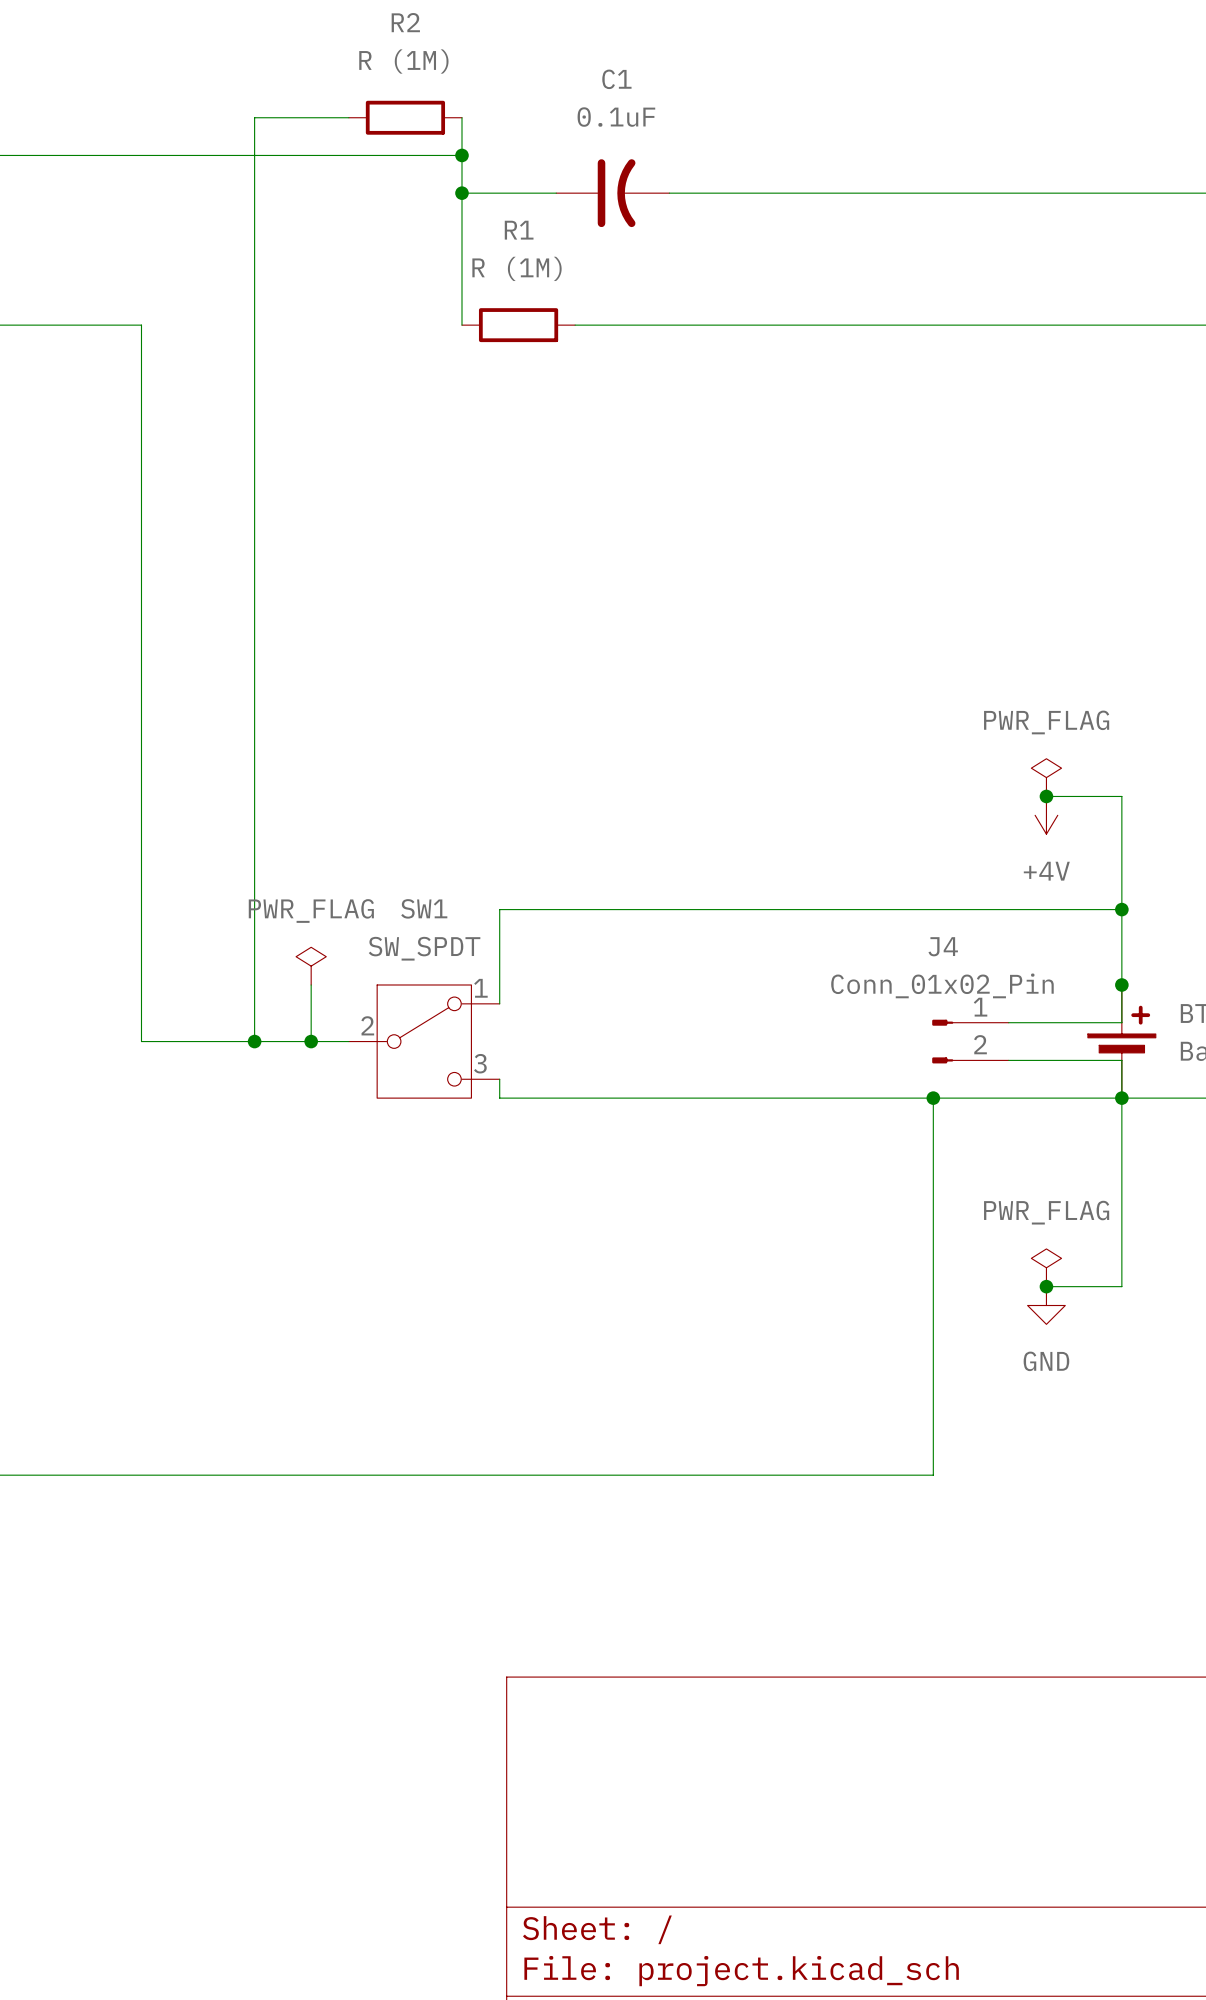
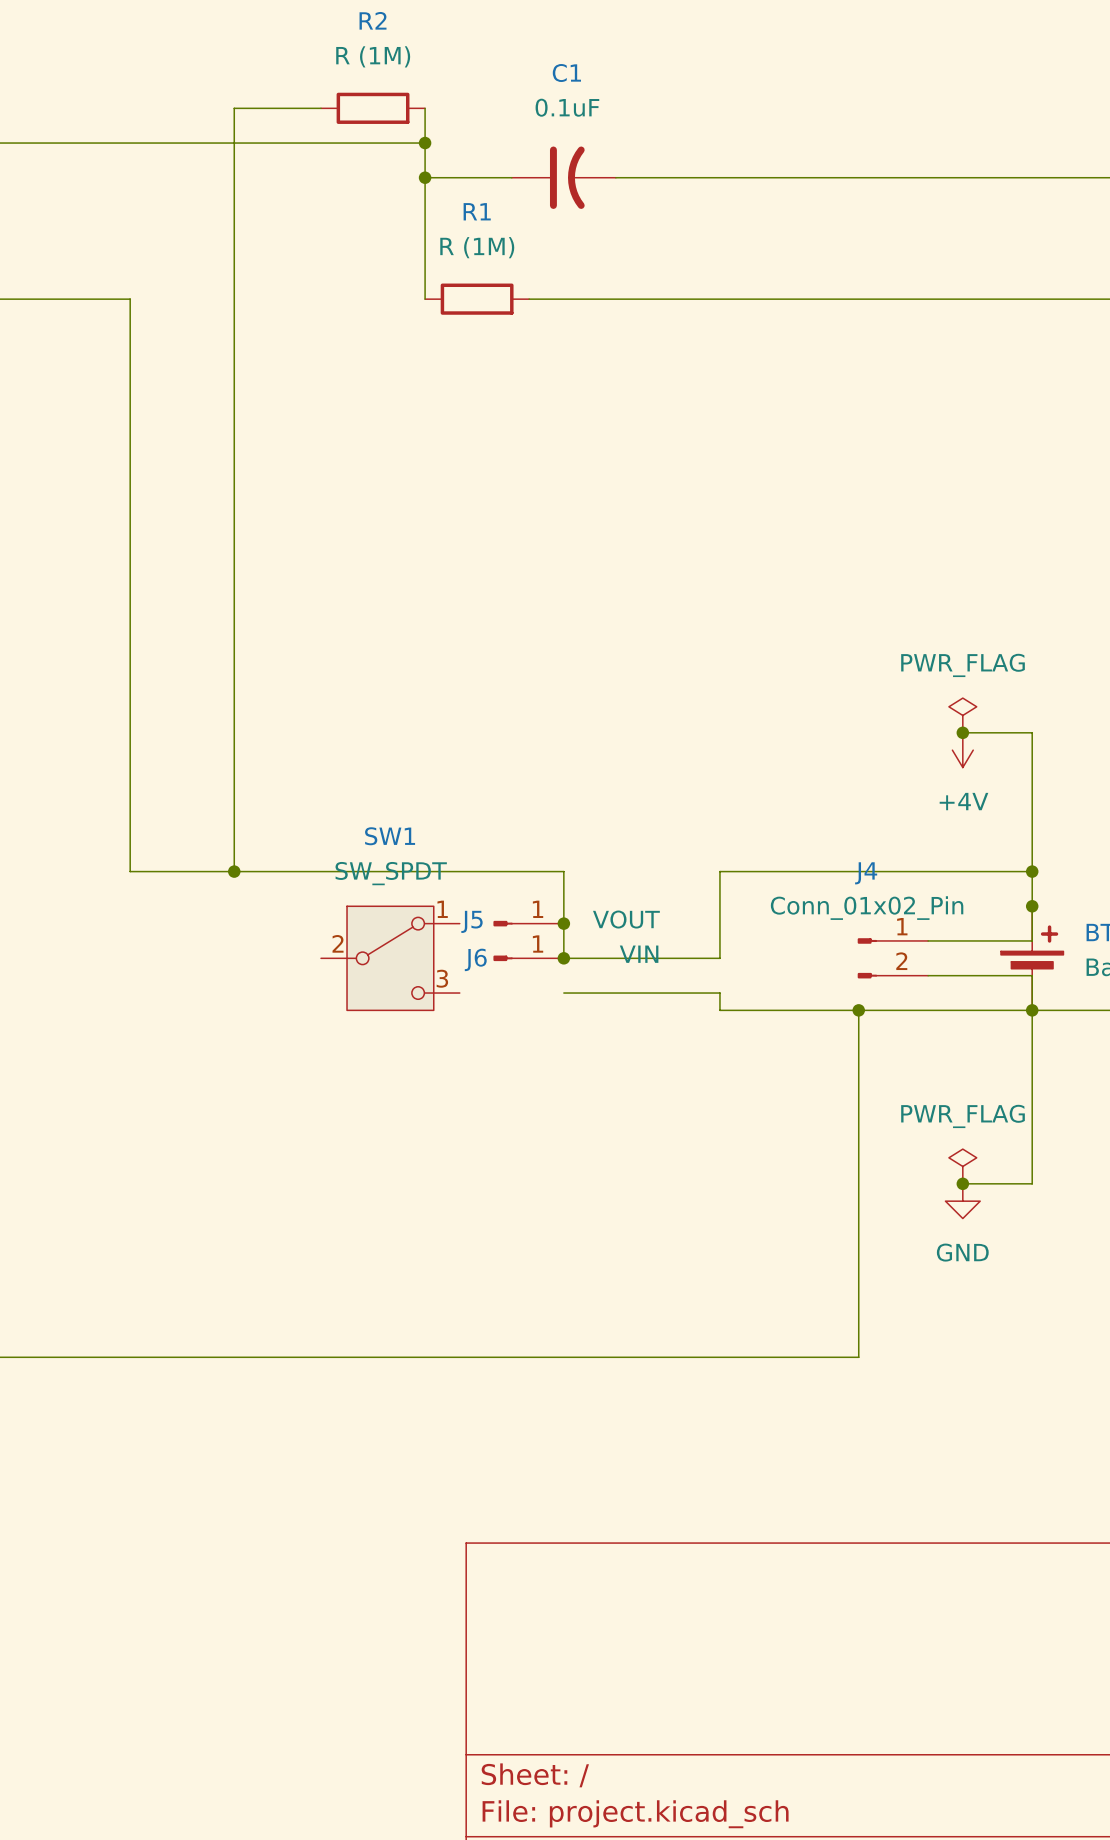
wire: (1121, 909) (499, 909) (499, 1003) -> none
junction position: (1121, 909) -> (1032, 871)
wire: (141, 947) (141, 1041) (348, 1041) -> (130, 871) (563, 871) (563, 958) (719, 958) (719, 871) (1032, 871)
wire: (254, 947) (254, 1041) -> none
junction: none -> (234, 871)
power symbol: PWR_FLAG (311, 966) -> none
wire: (311, 984) (311, 1041) -> none
J5: none -> VOUT (528, 923)
junction: none -> (563, 923)
junction: (254, 1041) -> none
junction: (311, 1041) -> none
J6: none -> VIN (528, 958)
junction: none -> (563, 958)
wire: (499, 1079) (499, 1098) (782, 1098) -> (563, 993) (719, 993) (719, 1010)

